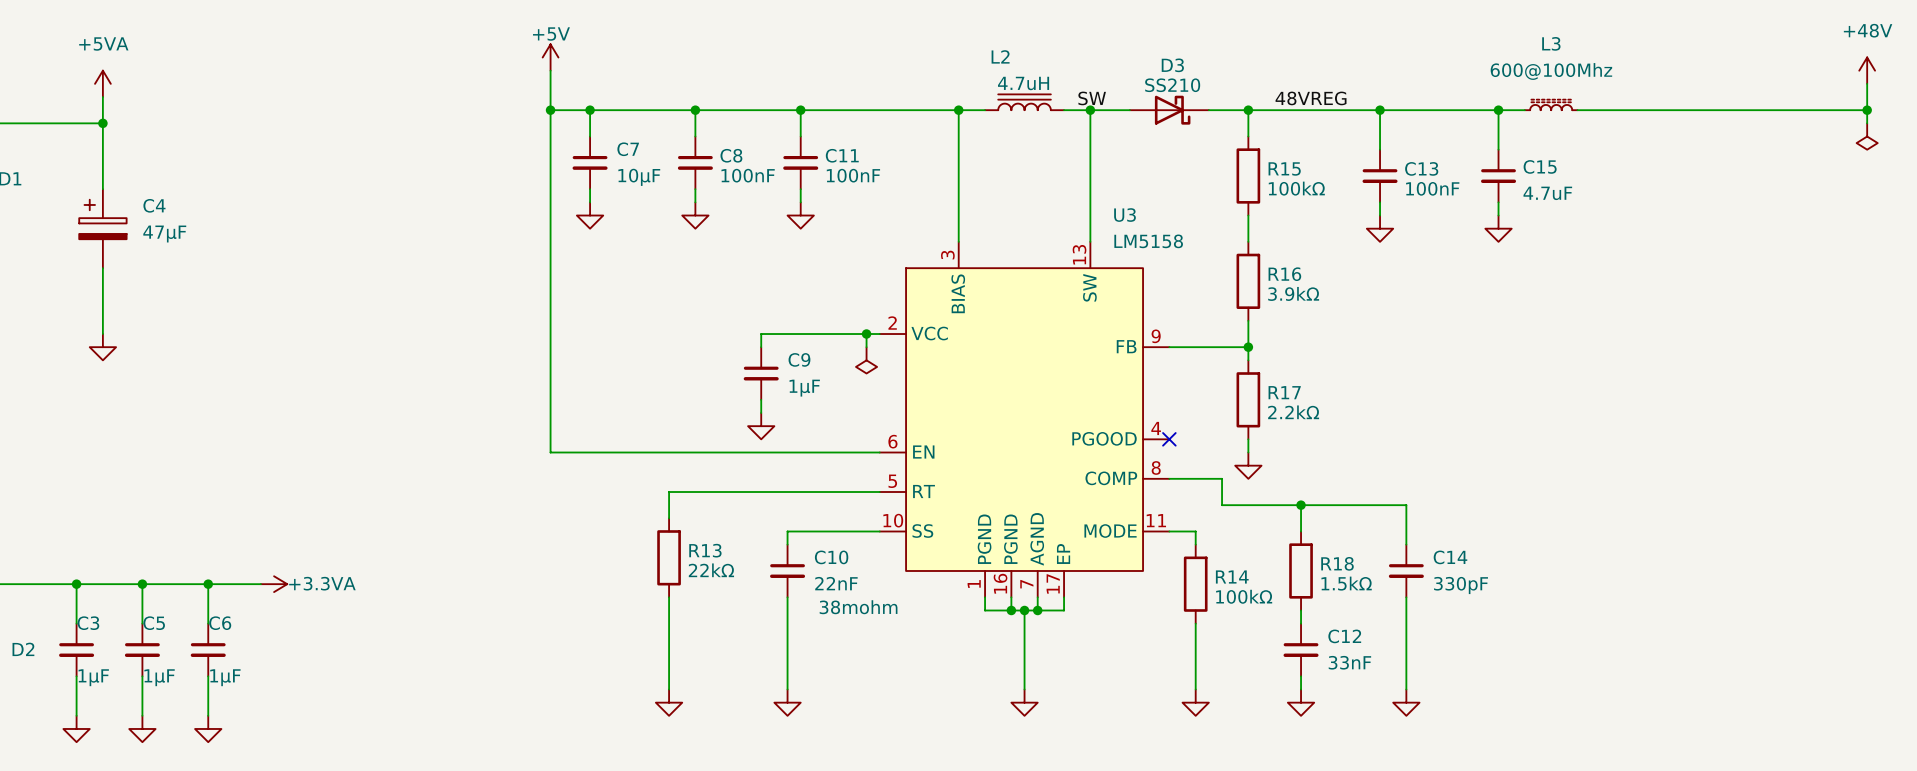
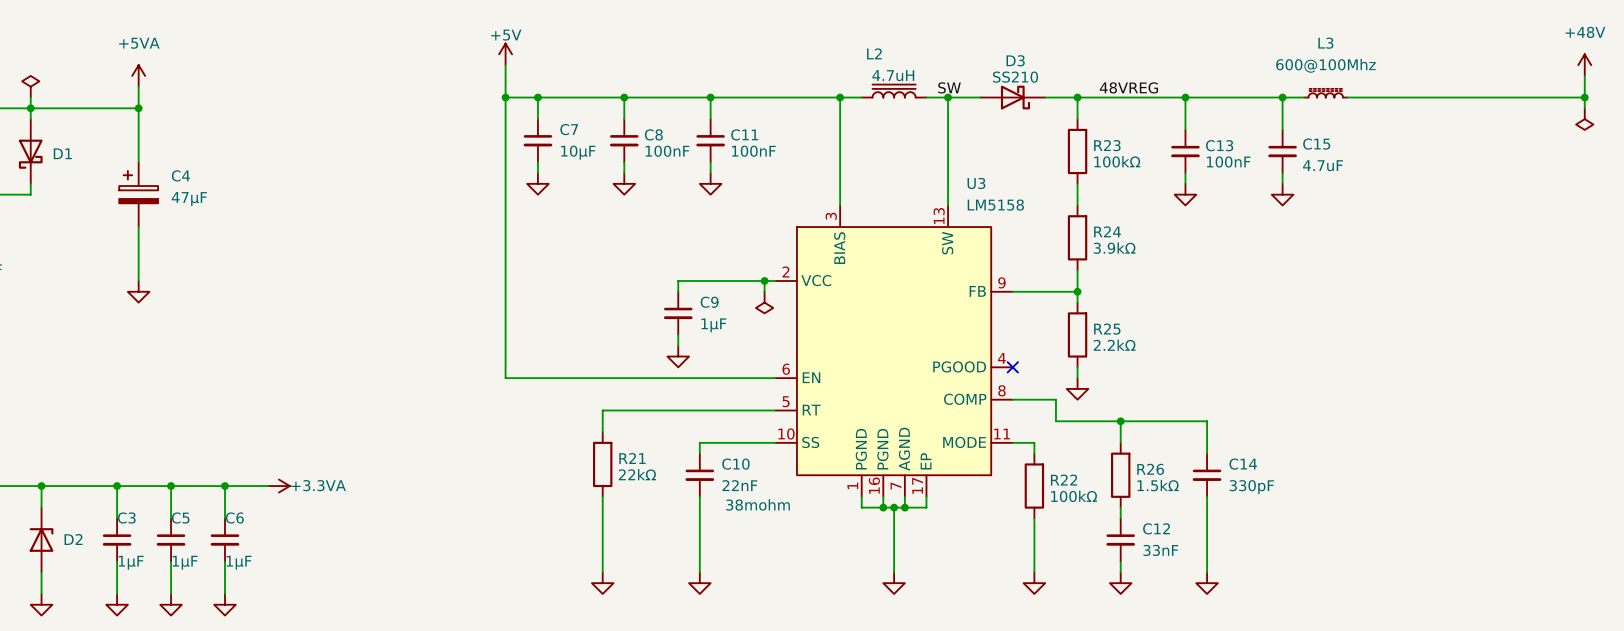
R15 name: R15 (1284, 168) -> R23 (1107, 145)
R16 name: R16 (1284, 274) -> R24 (1107, 231)
R17 name: R17 (1284, 392) -> R25 (1107, 329)
R13 name: R13 (705, 550) -> R21 (632, 458)
R18 name: R18 (1337, 563) -> R26 (1150, 469)
R14 name: R14 (1232, 576) -> R22 (1064, 480)

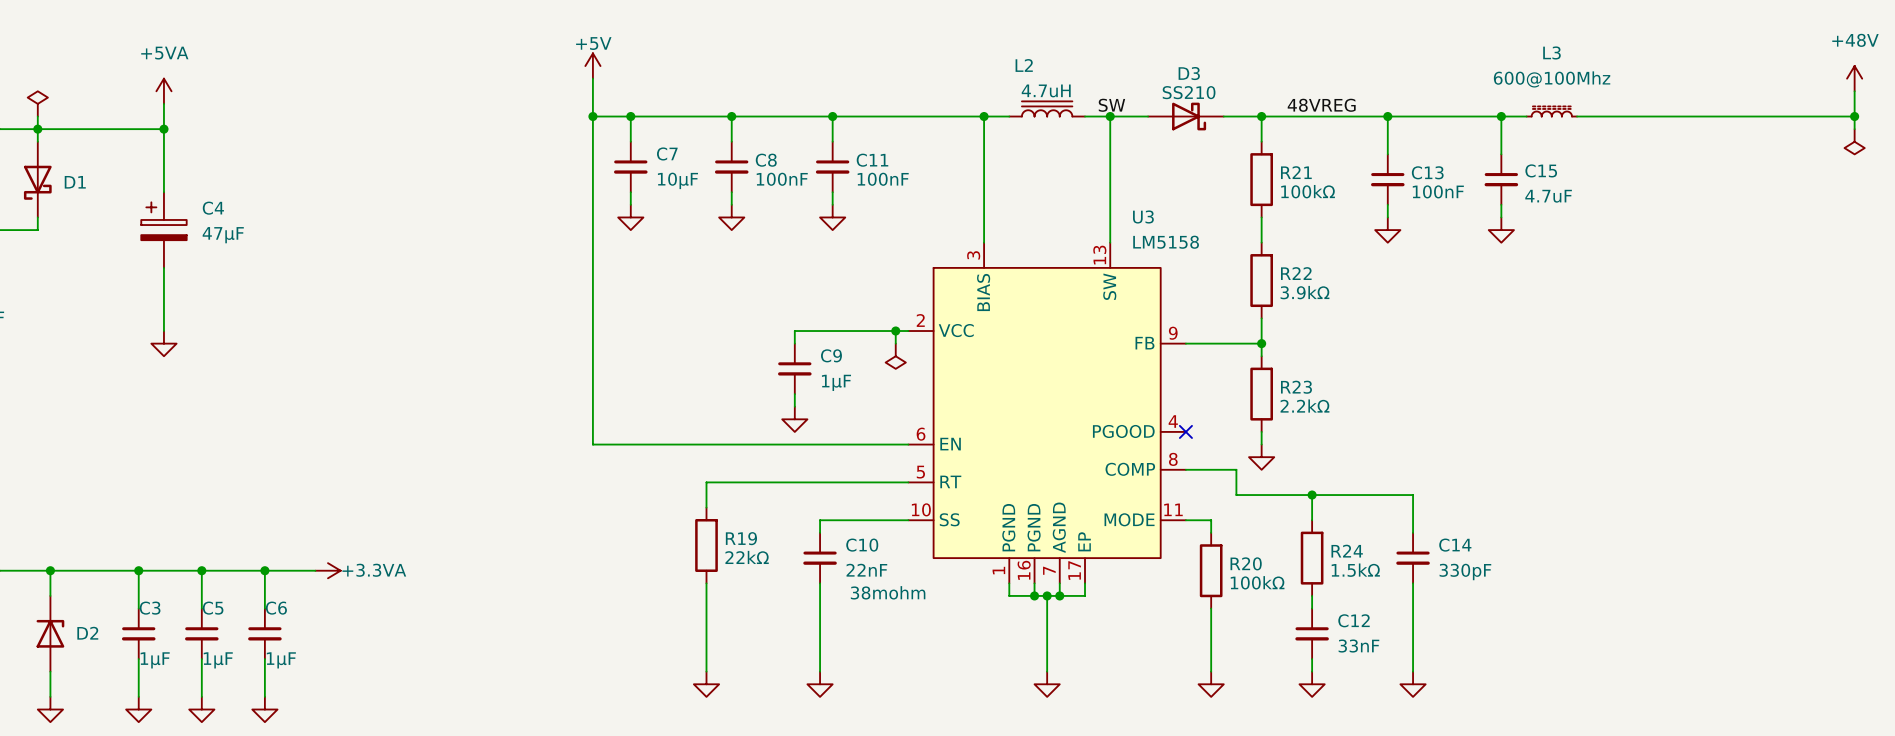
R23 name: R23 (1107, 145) -> R21 (1296, 172)
R24 name: R24 (1107, 231) -> R22 (1296, 273)
R25 name: R25 (1107, 329) -> R23 (1296, 387)
R21 name: R21 (632, 458) -> R19 (741, 538)
R26 name: R26 (1150, 469) -> R24 (1347, 551)
R22 name: R22 (1064, 480) -> R20 (1246, 563)

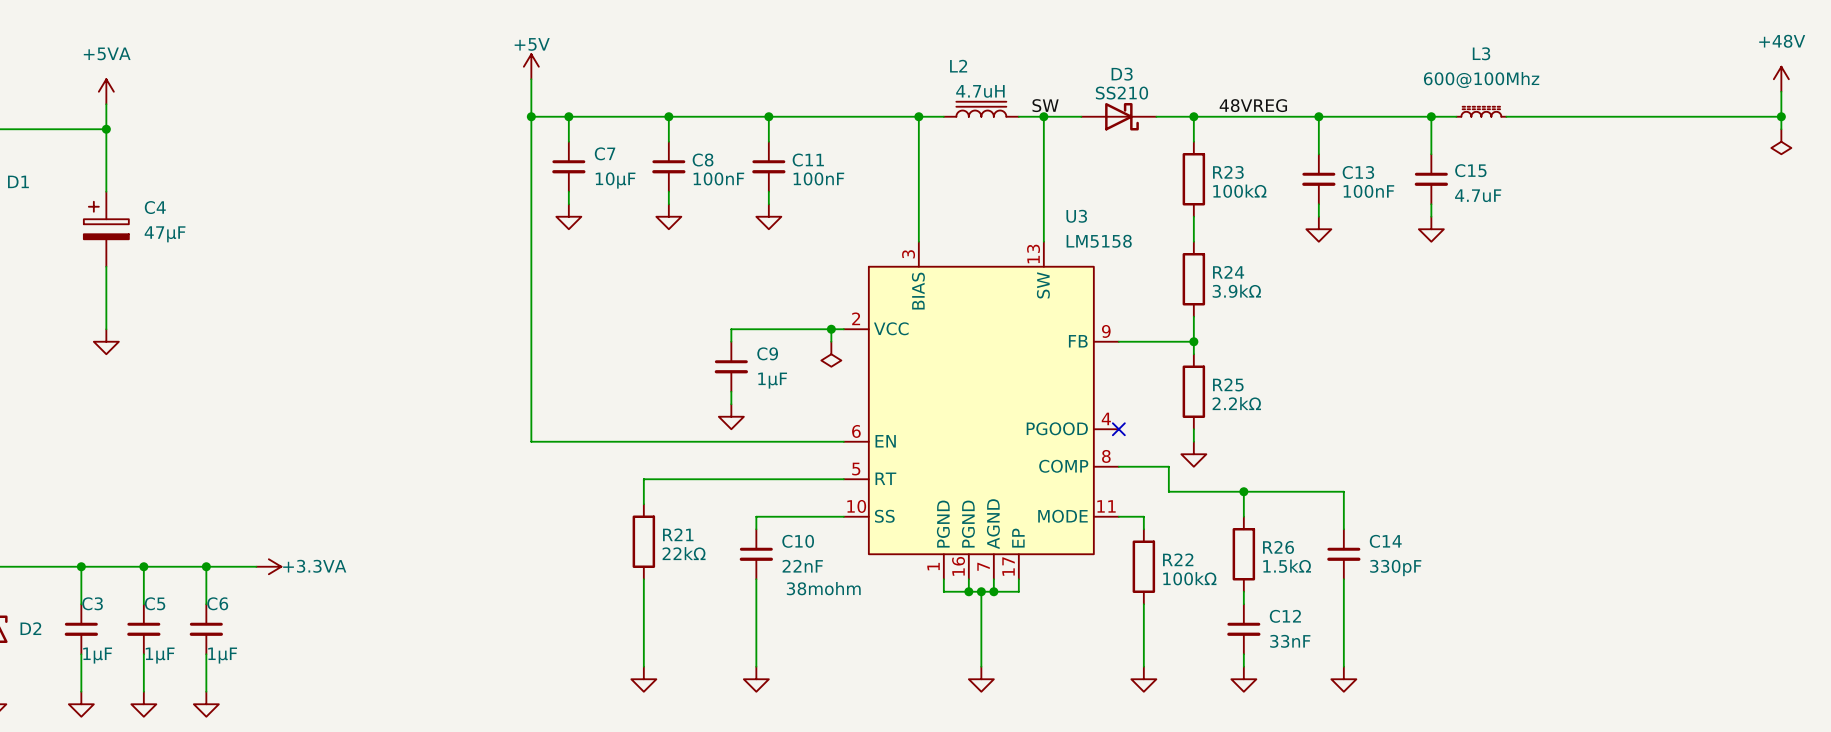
R21 name: R21 (1296, 172) -> R23 (1228, 172)
R22 name: R22 (1296, 273) -> R24 (1228, 272)
R23 name: R23 (1296, 387) -> R25 (1228, 384)
R19 name: R19 (741, 538) -> R21 (678, 534)
R24 name: R24 (1347, 551) -> R26 (1278, 547)
R20 name: R20 (1246, 563) -> R22 (1178, 559)

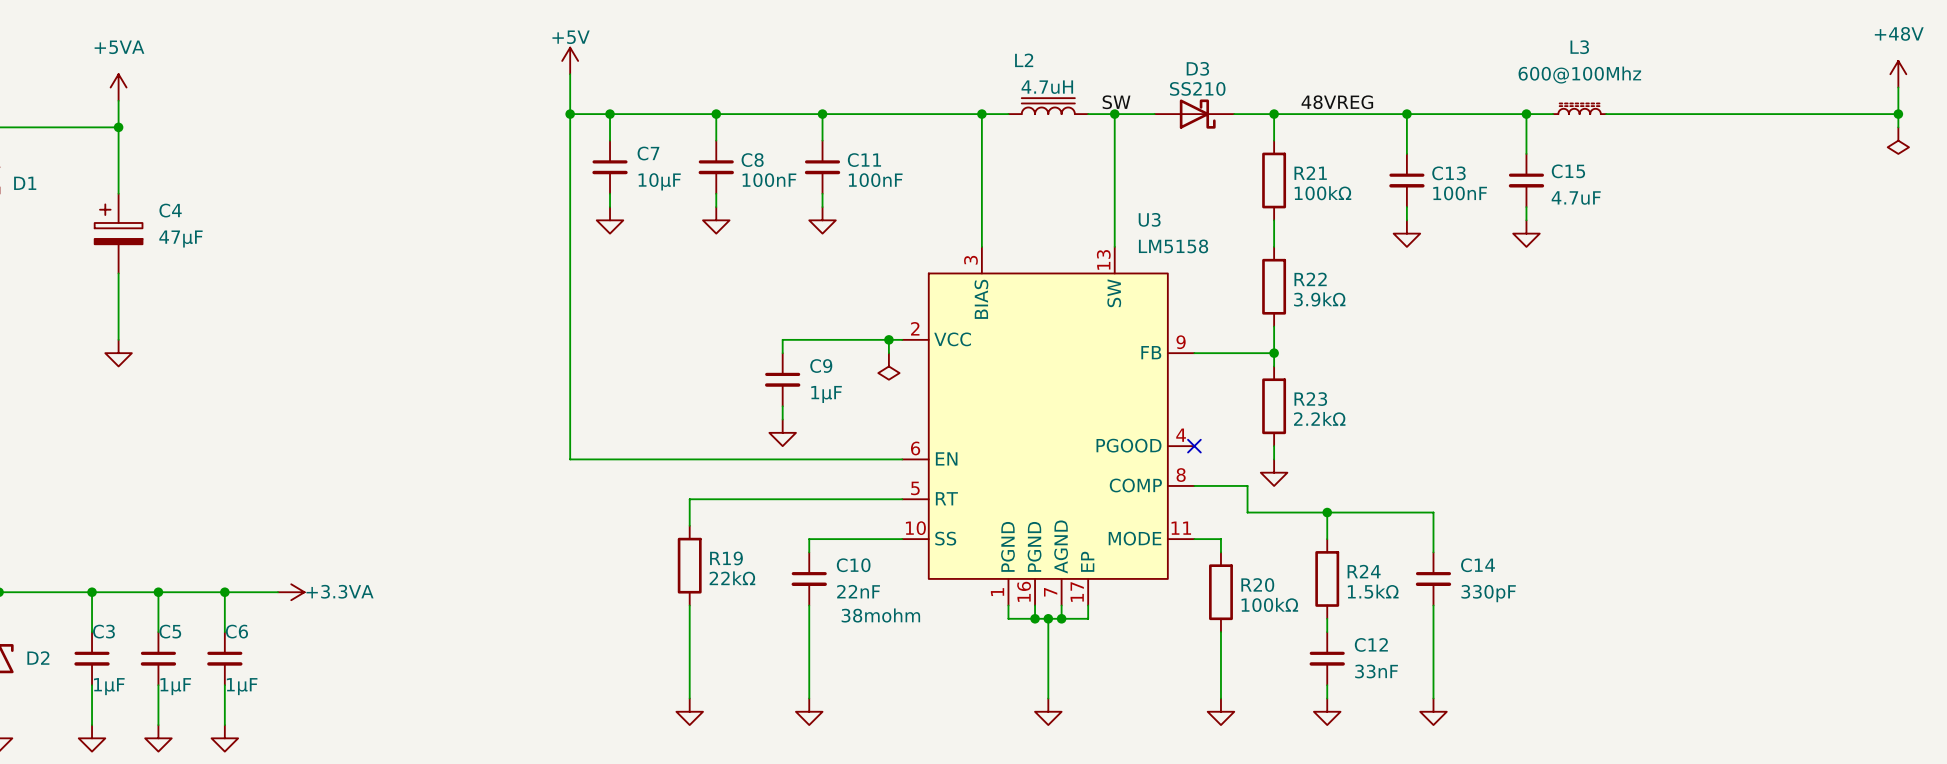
R23 name: R23 (1228, 172) -> R21 (1310, 173)
R24 name: R24 (1228, 272) -> R22 (1310, 279)
R25 name: R25 (1228, 384) -> R23 (1310, 399)
R21 name: R21 (678, 534) -> R19 (726, 558)
R26 name: R26 (1278, 547) -> R24 (1364, 571)
R22 name: R22 (1178, 559) -> R20 (1257, 585)

